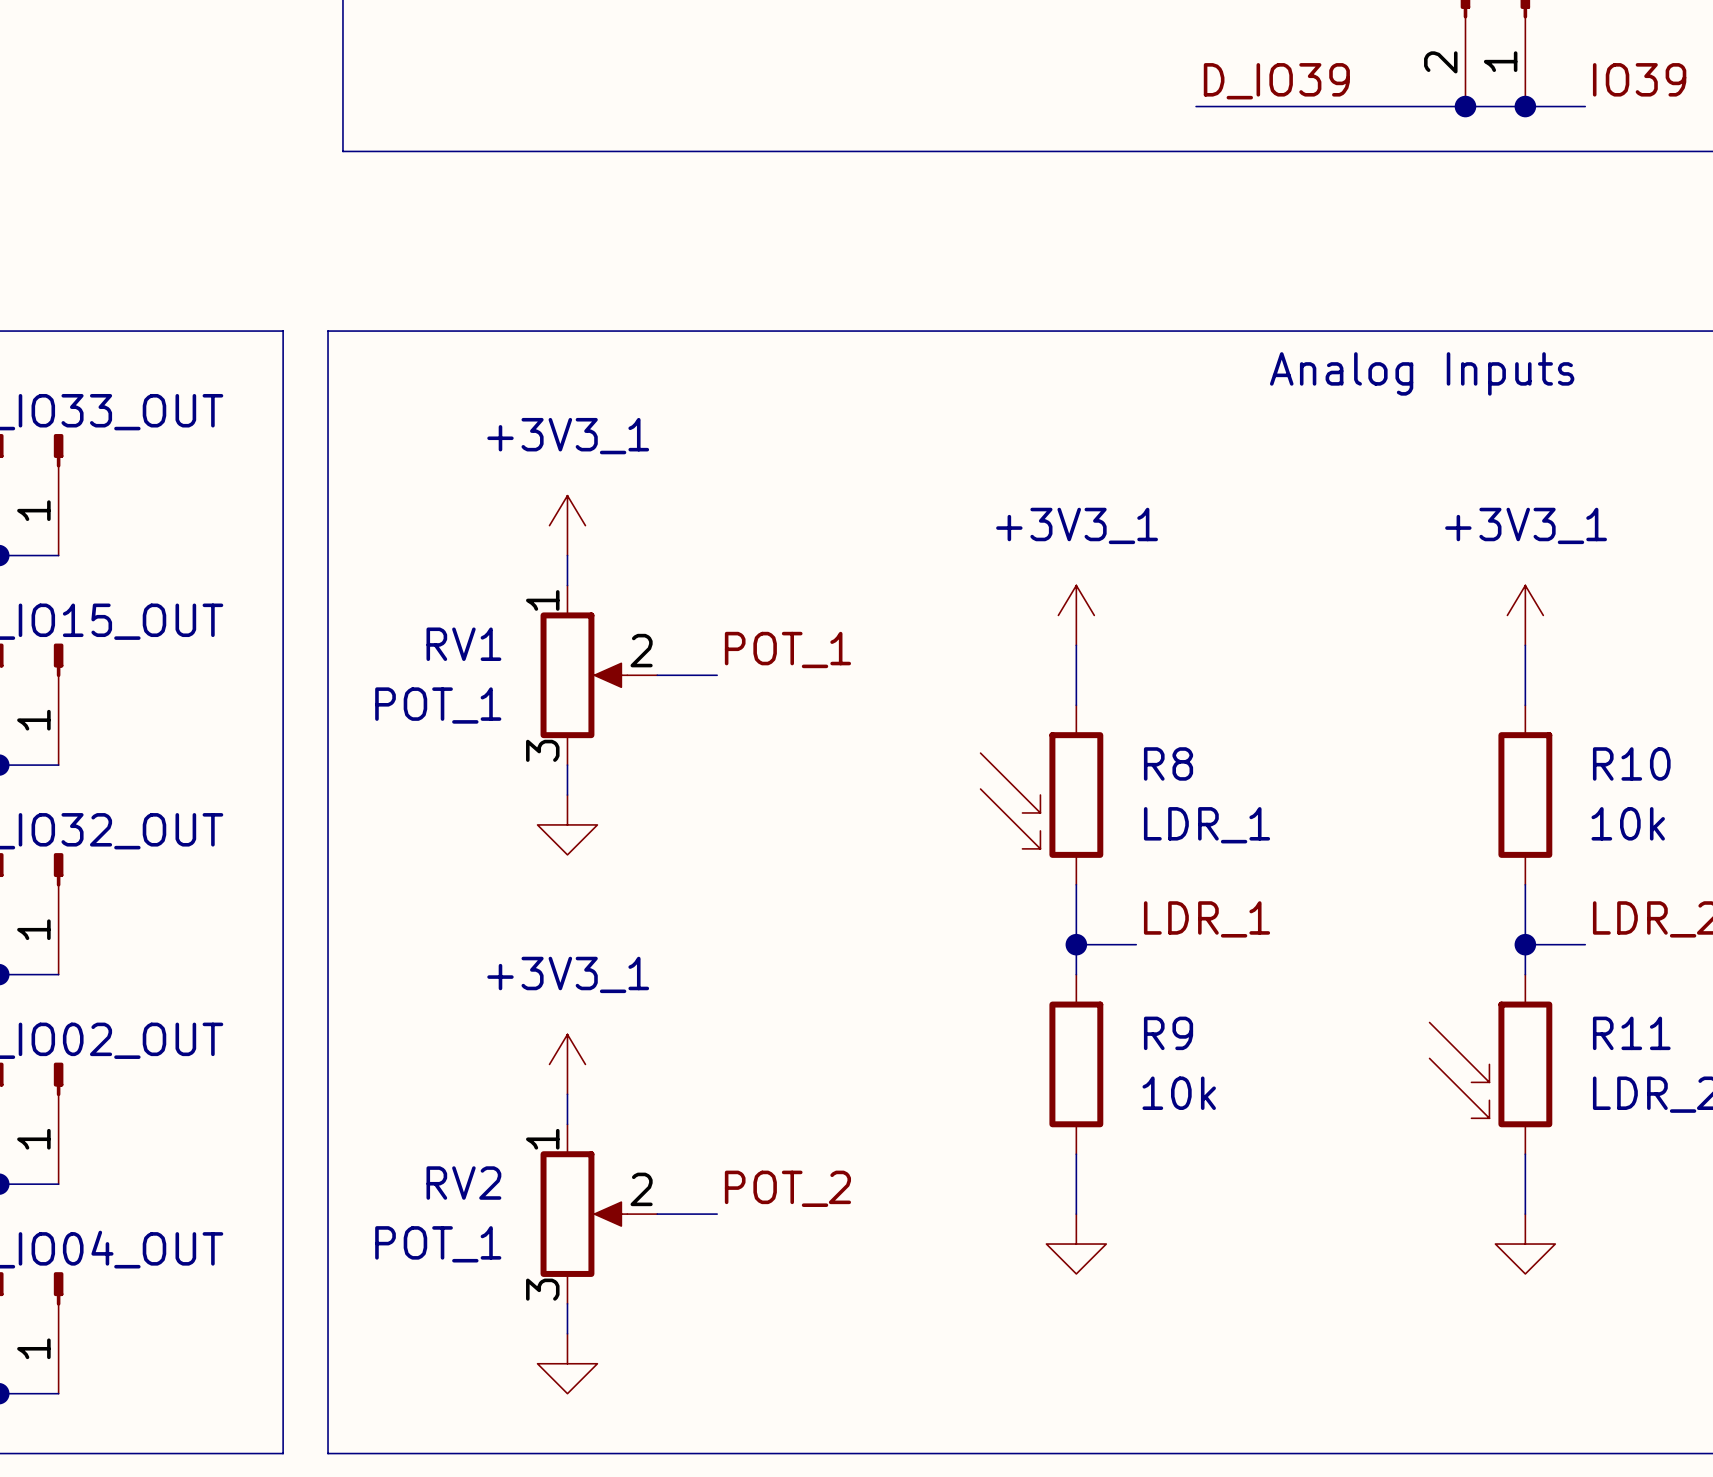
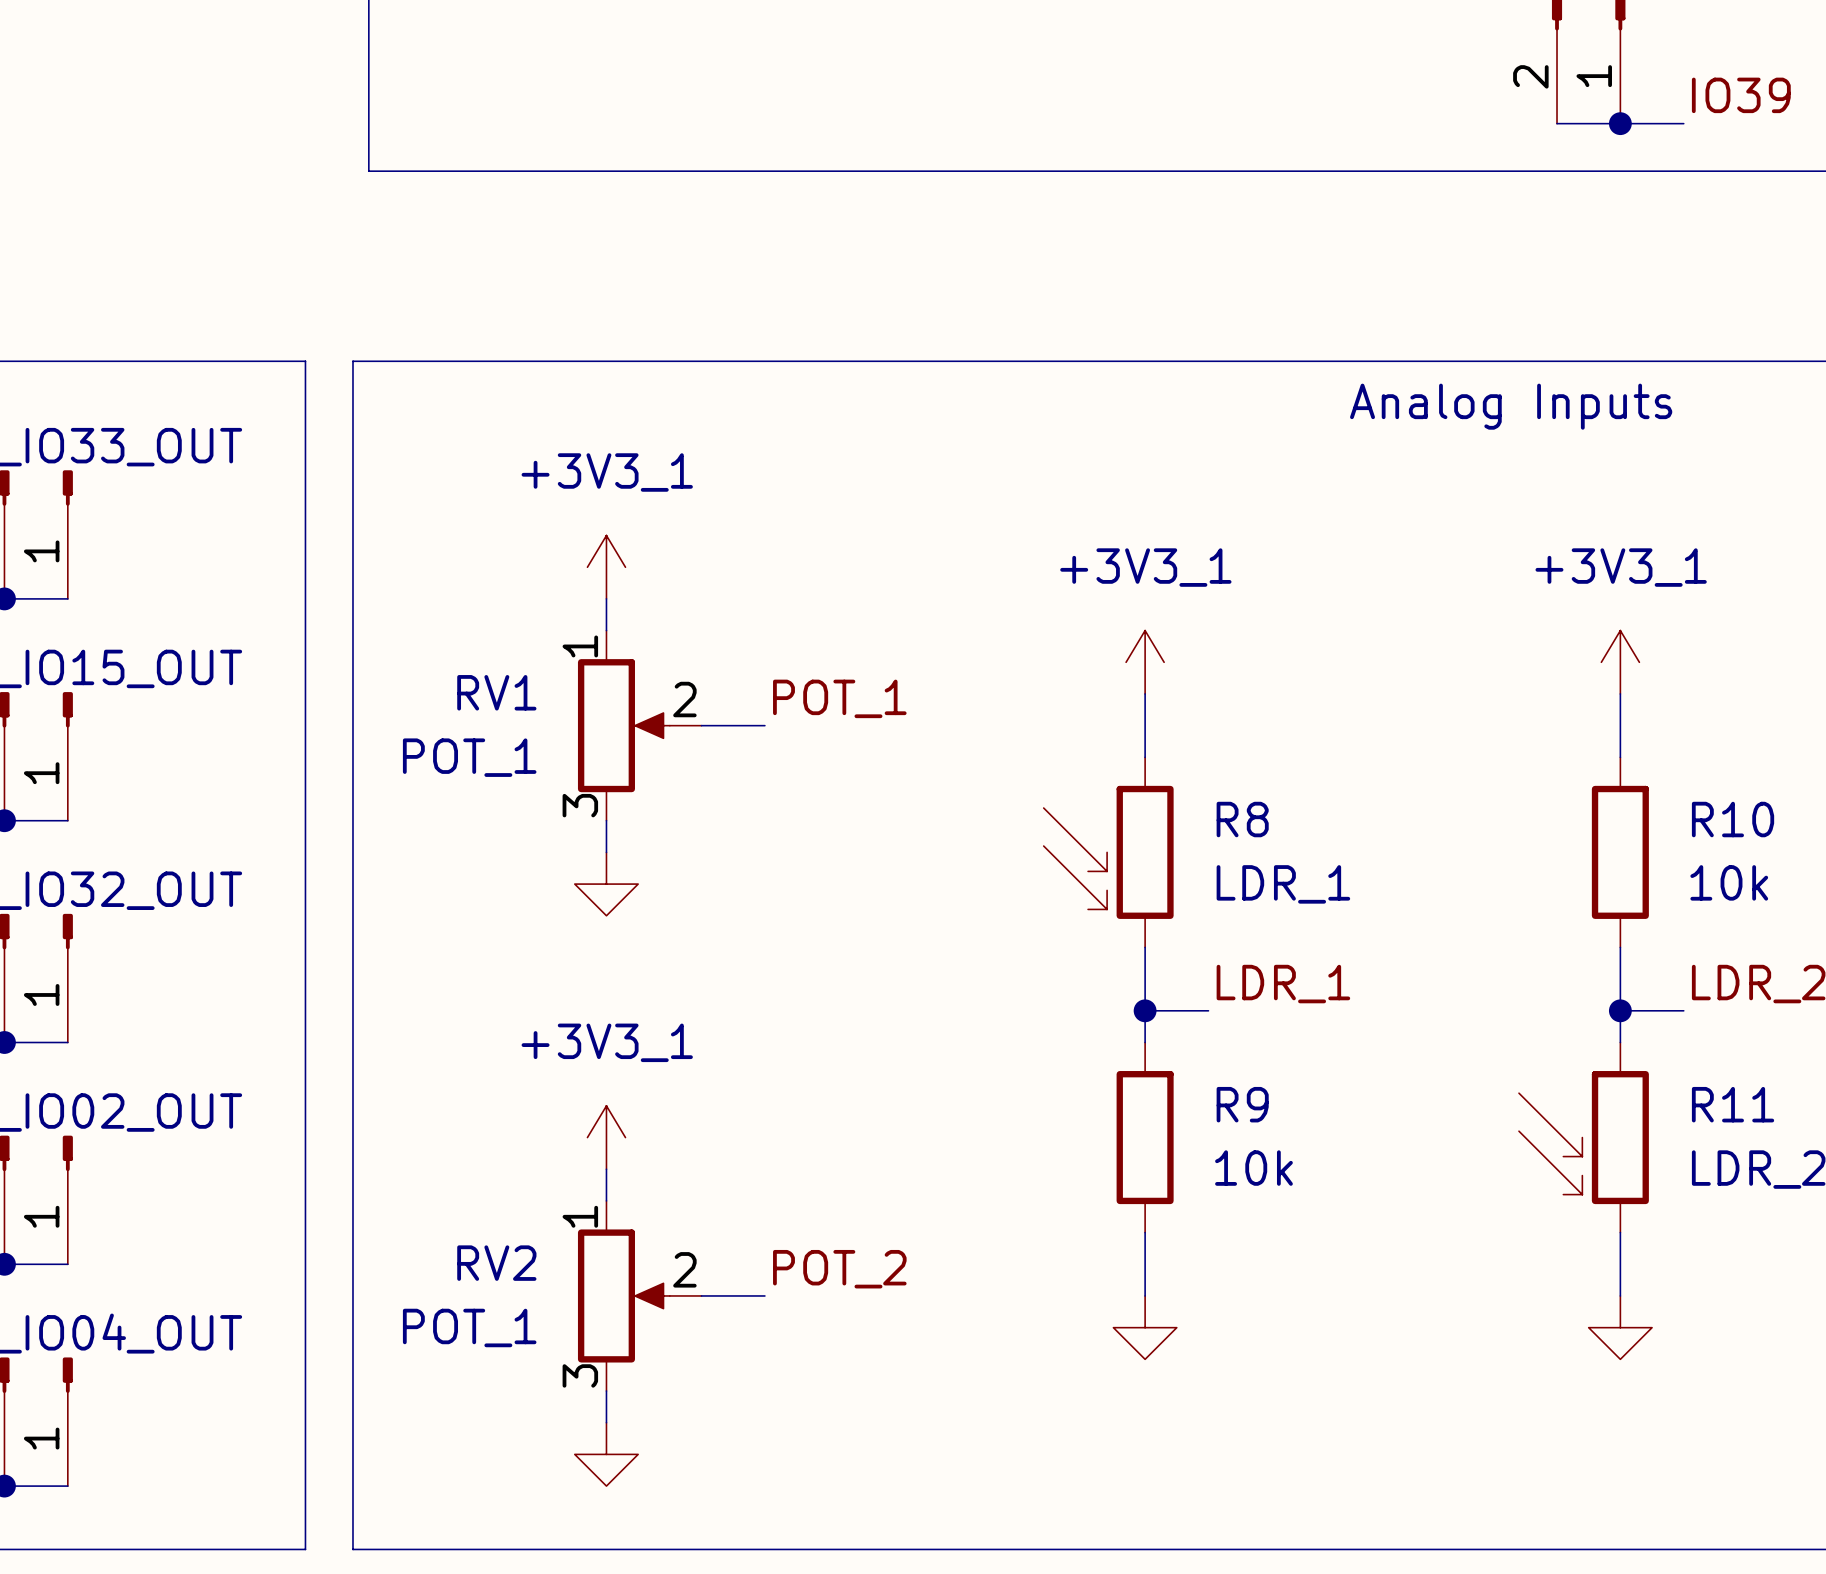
label: D_IO39 (1276, 81) -> none
wire: (1196, 106) (1465, 106) -> none
junction: (1465, 106) -> none

